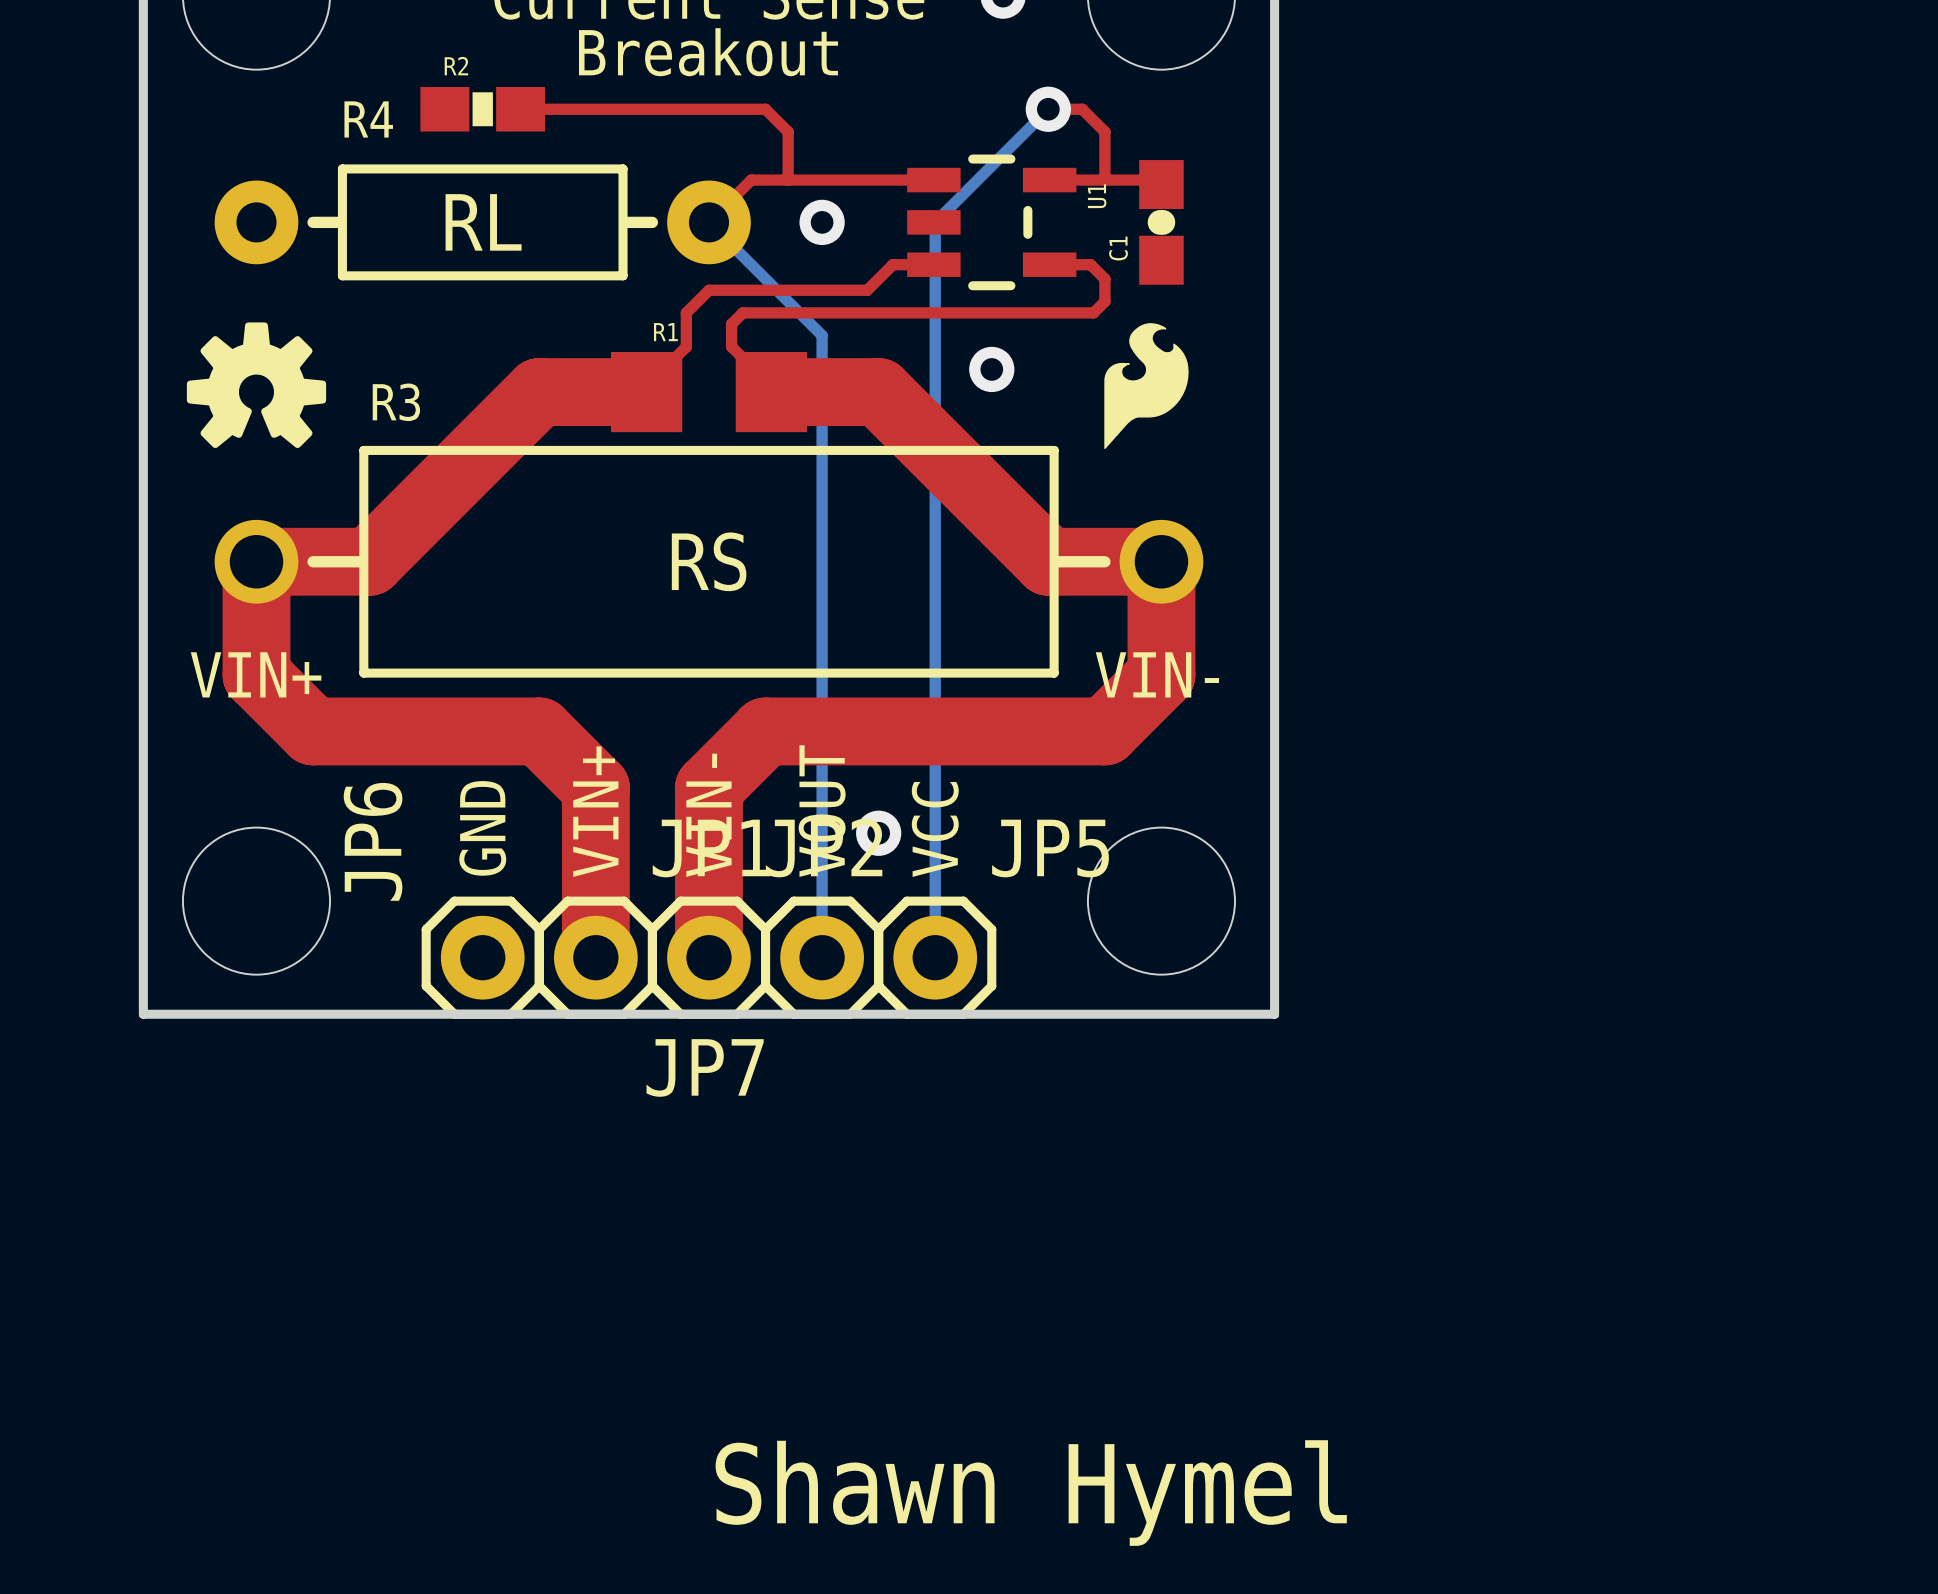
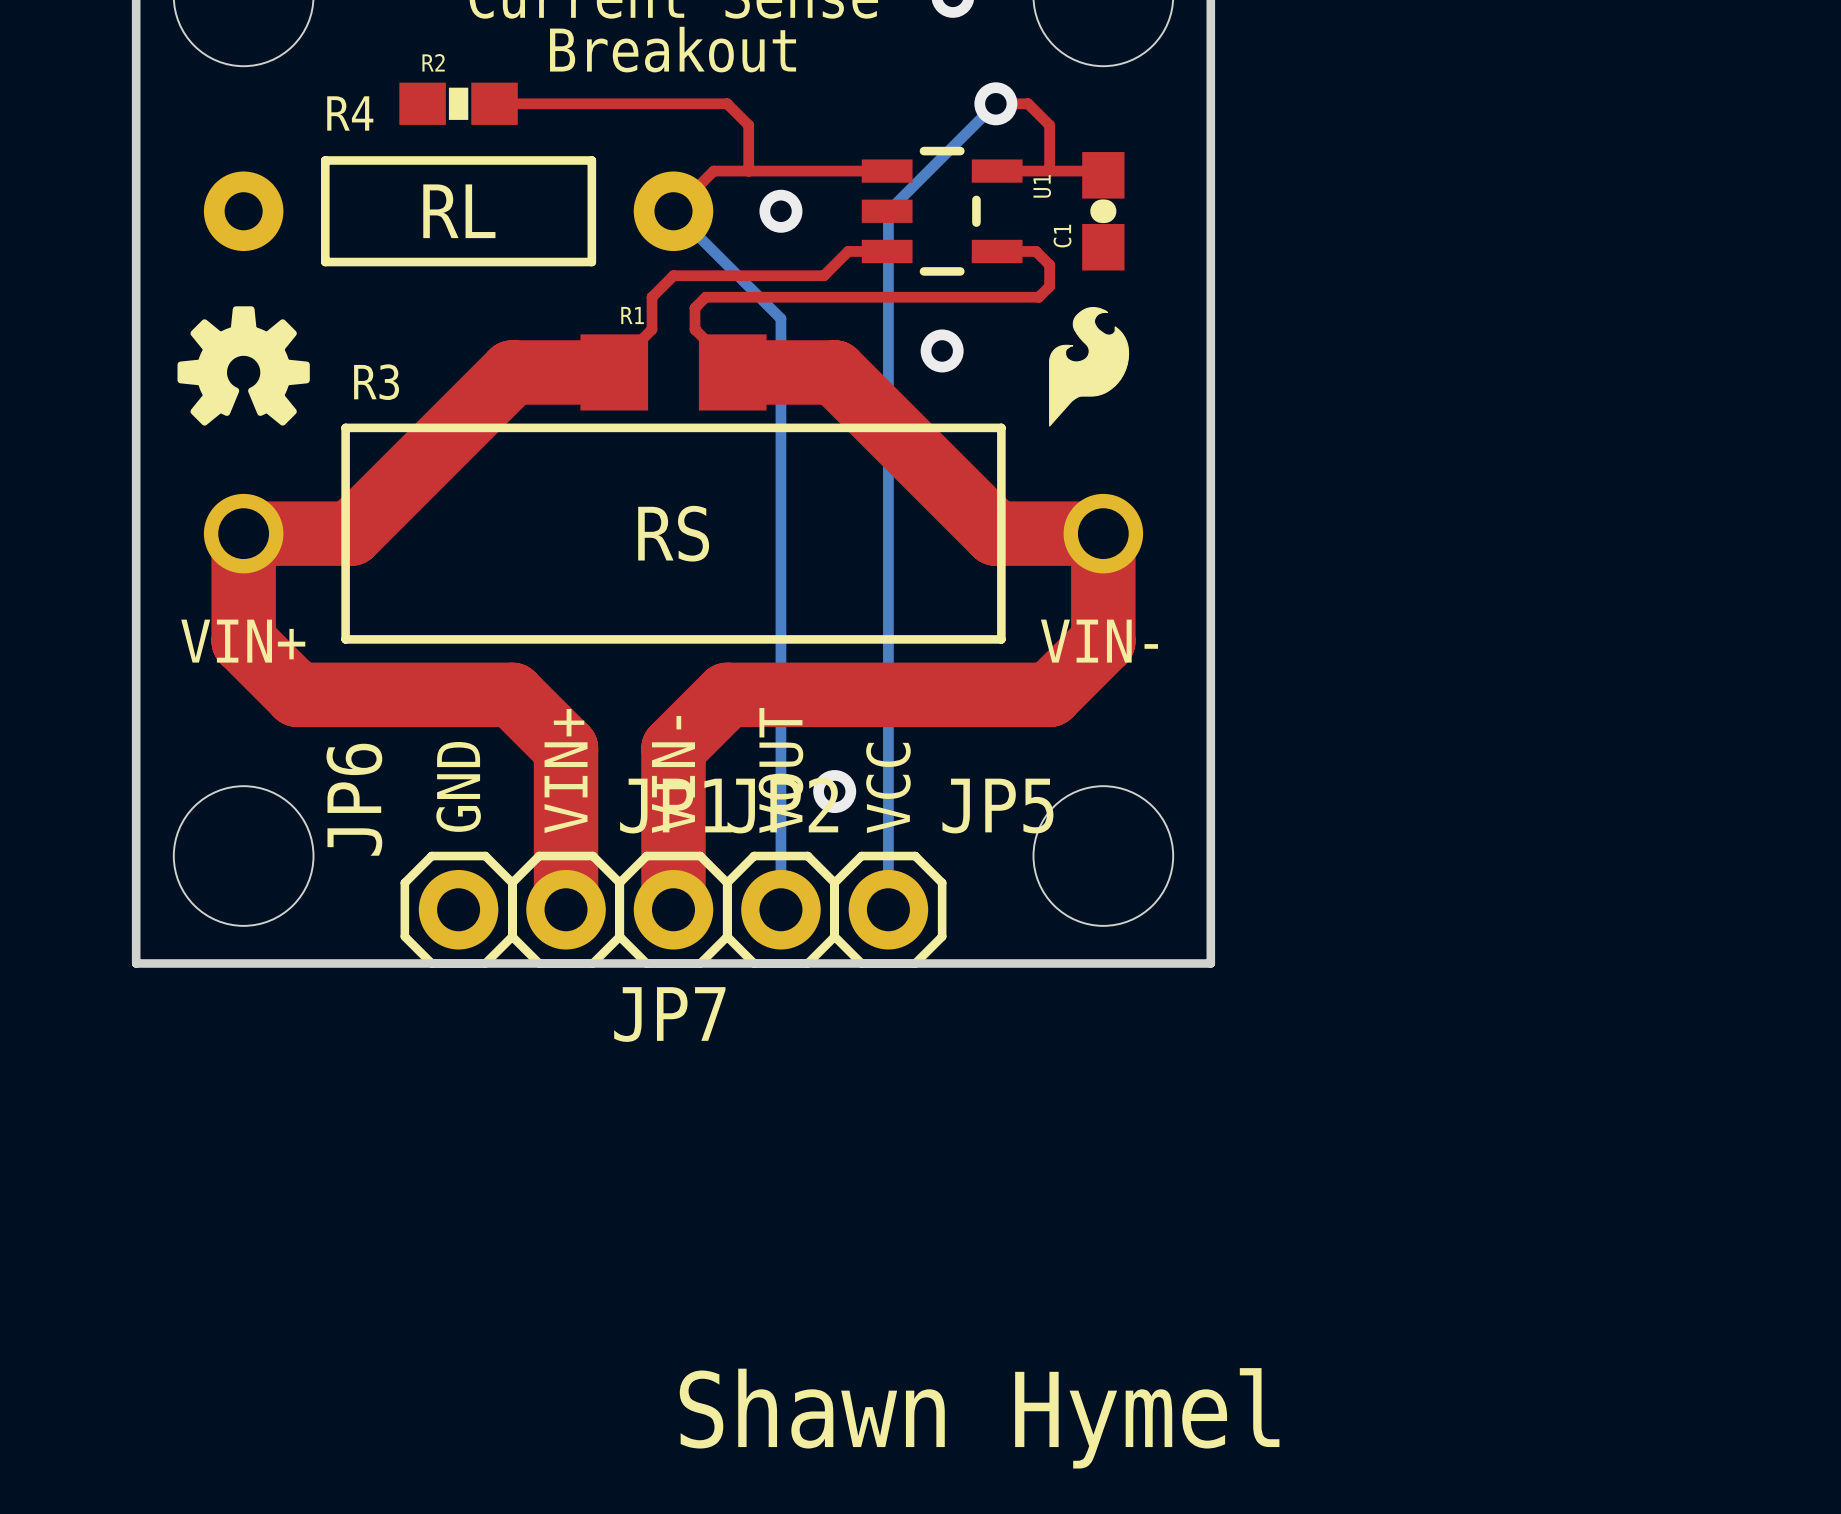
line: (313, 222) (340, 222) -> none
line: (625, 222) (652, 222) -> none
line: (313, 561) (361, 561) -> none
line: (1056, 561) (1104, 561) -> none

